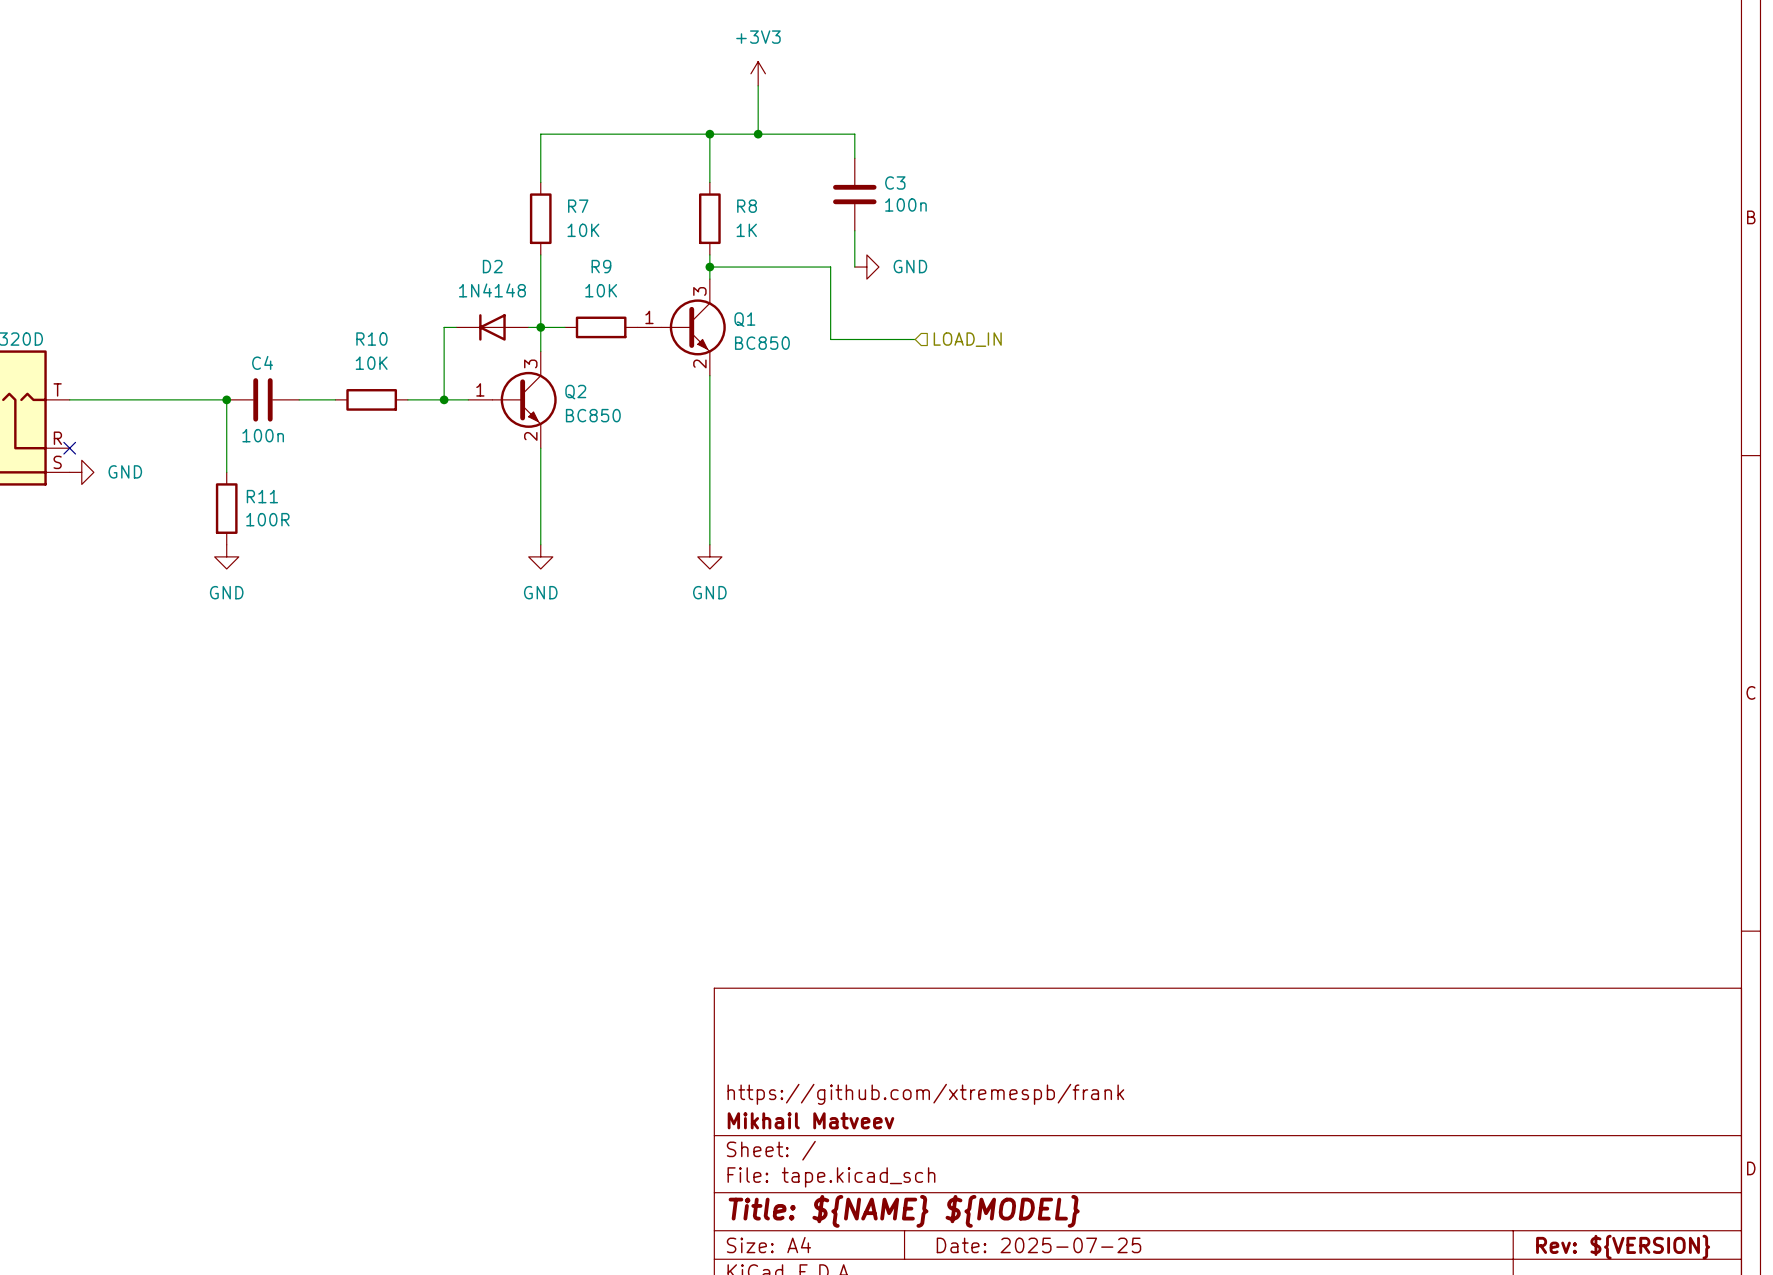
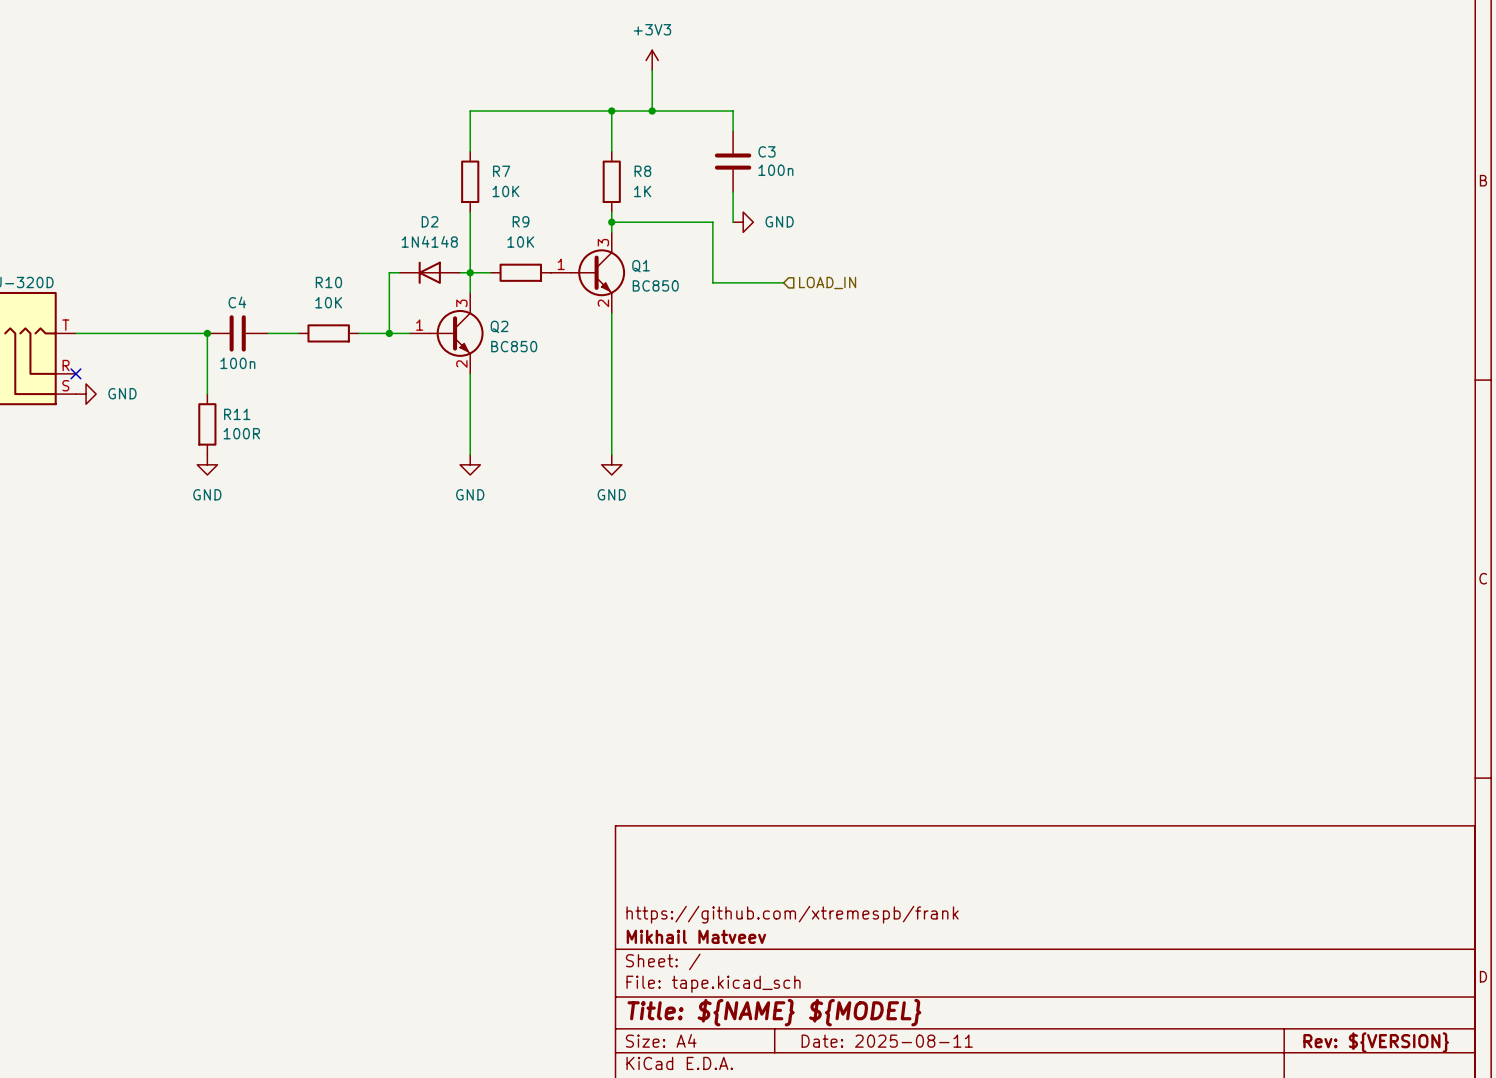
title block: Date: 2025-07-25 (1038, 1245) -> Date: 2025-08-11 (887, 1041)

